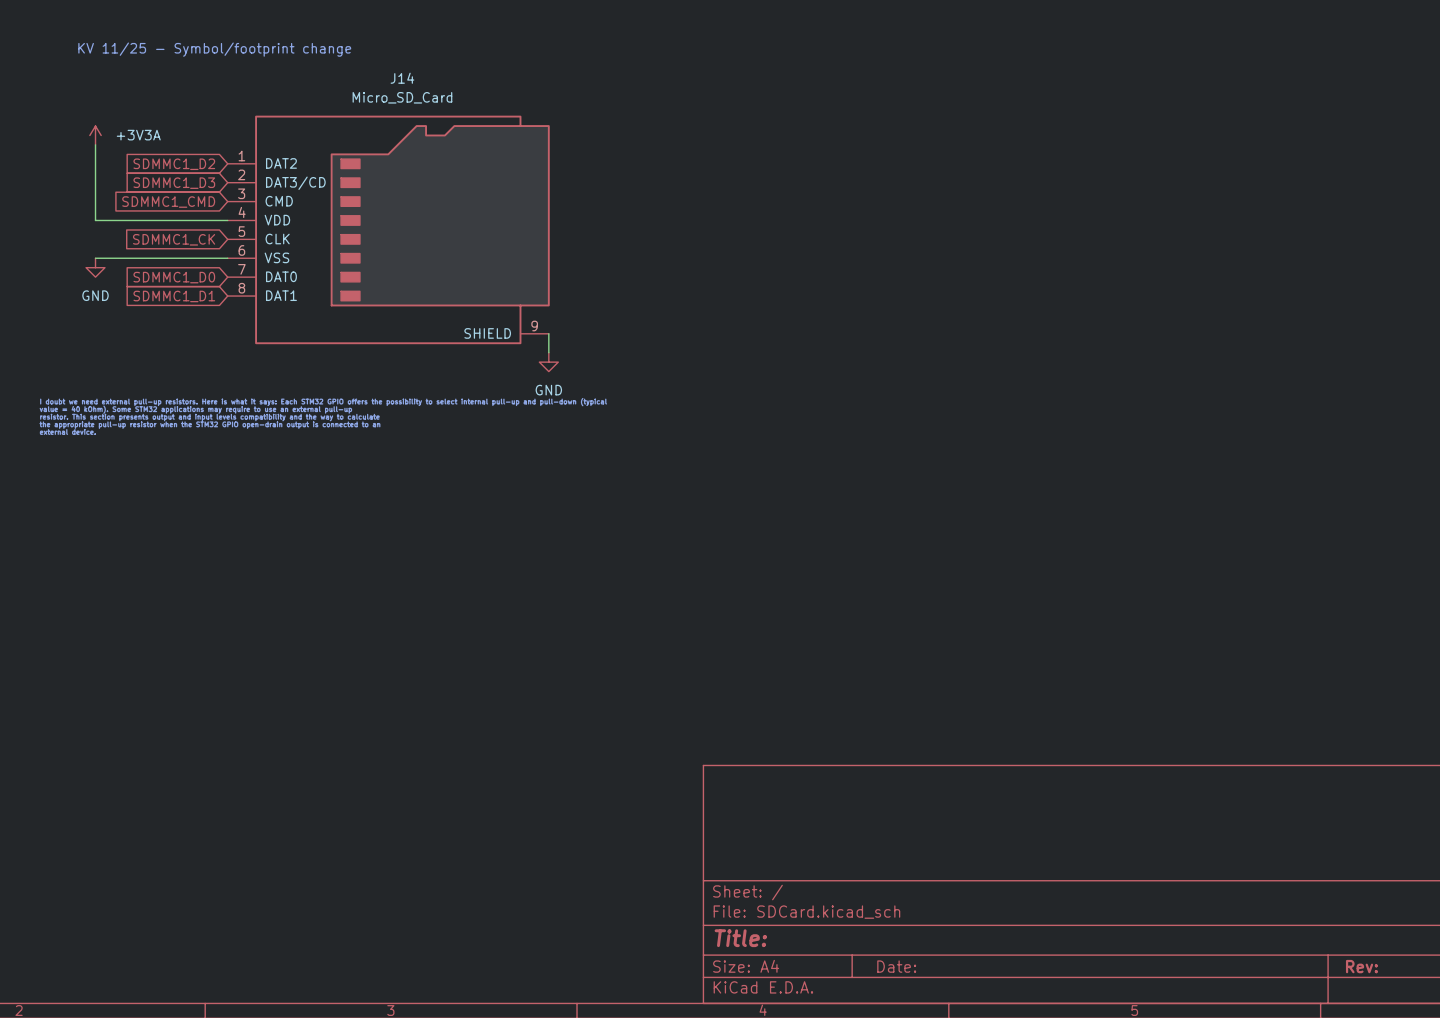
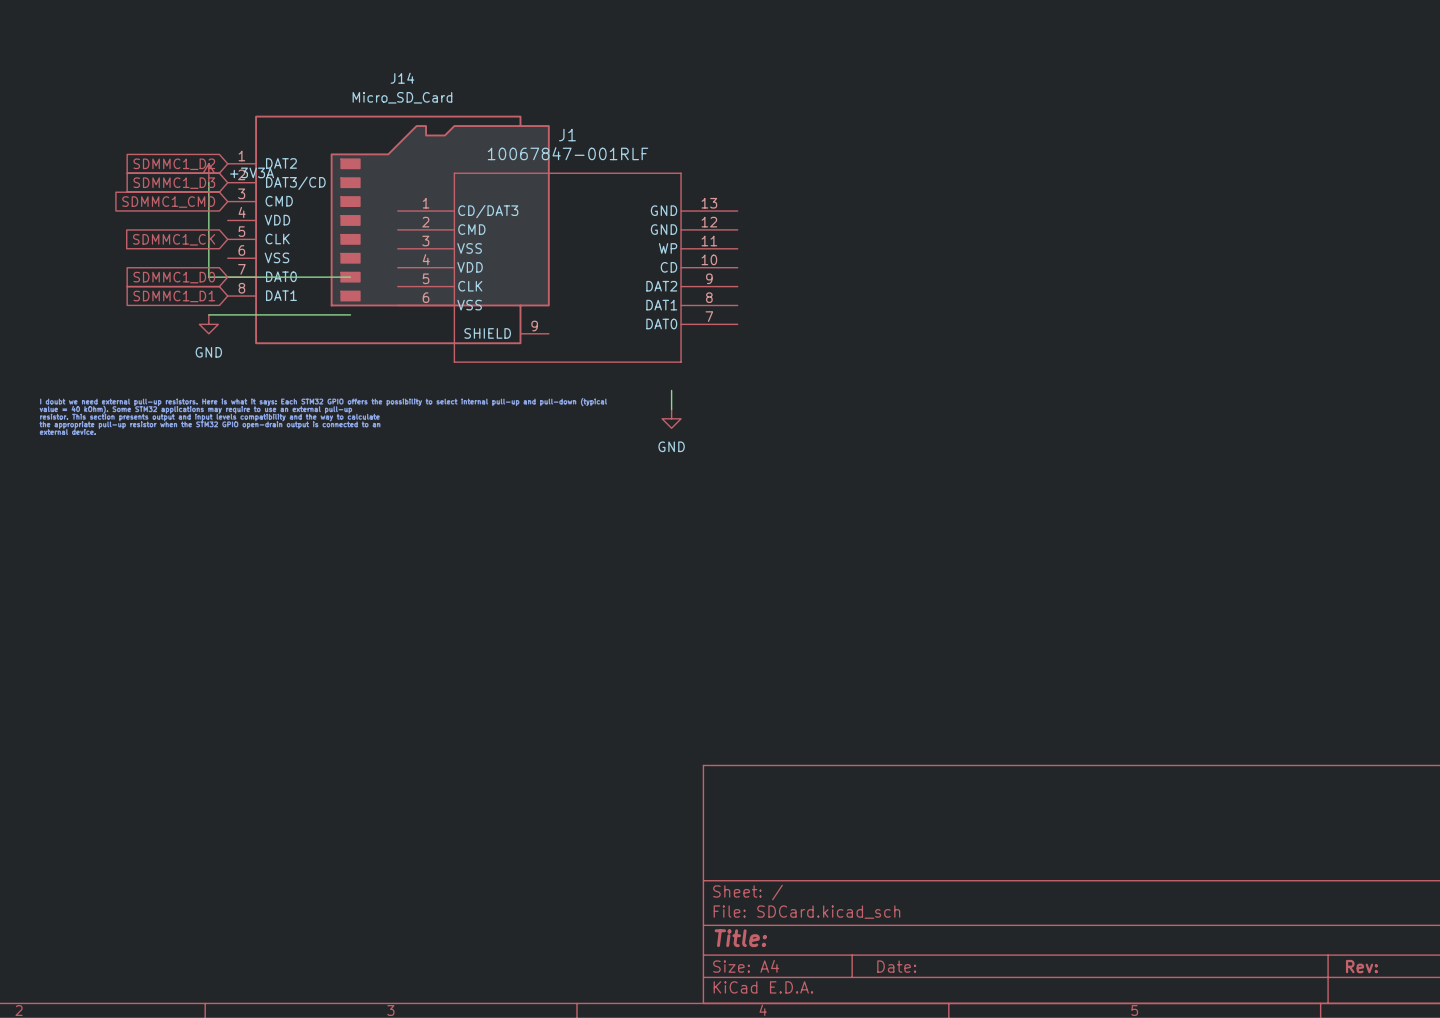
text: KV 11/25 - Symbol/footprint change (214, 49) -> none
power symbol position: +3V3A (95, 135) -> +3V3A (208, 173)
wire: (95, 144) (95, 220) (227, 220) -> none
wire: none -> (208, 182) (208, 277) (350, 277)
wire: (95, 258) (227, 258) -> none
power symbol position: GND (95, 267) -> GND (208, 324)
J1: none -> 10067847-001RLF (567, 267)
wire: none -> (208, 314) (350, 314)
wire: (548, 333) (548, 352) -> (671, 390) (671, 409)
power symbol position: GND (548, 362) -> GND (671, 418)

